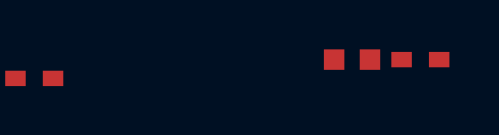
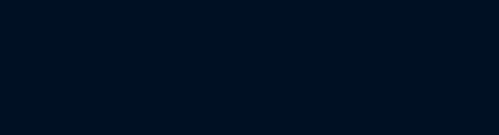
part: (352, 59) -> none
part: (420, 59) -> none
part: (34, 78) -> none

